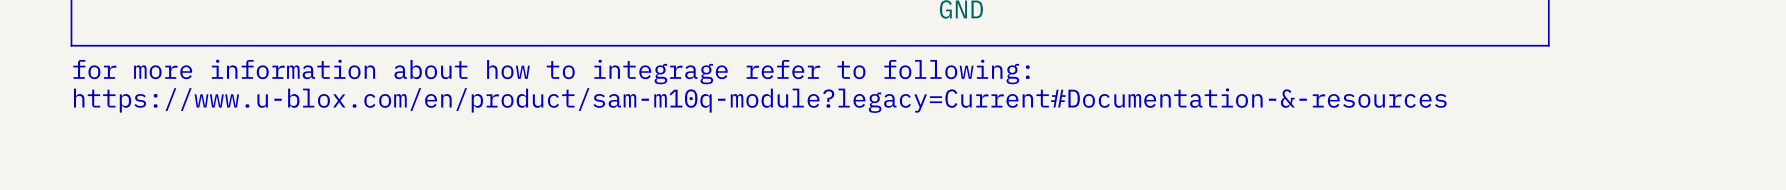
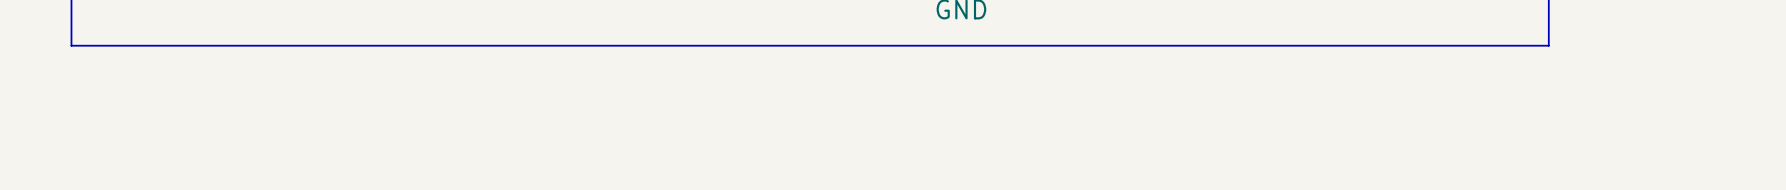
text: for more information about how to integrage refer to following: (551, 72) -> none
text: https://www.u-blox.com/en/product/sam-m10q-module?legacy=Current#Documentation-&-resources (760, 100) -> none

